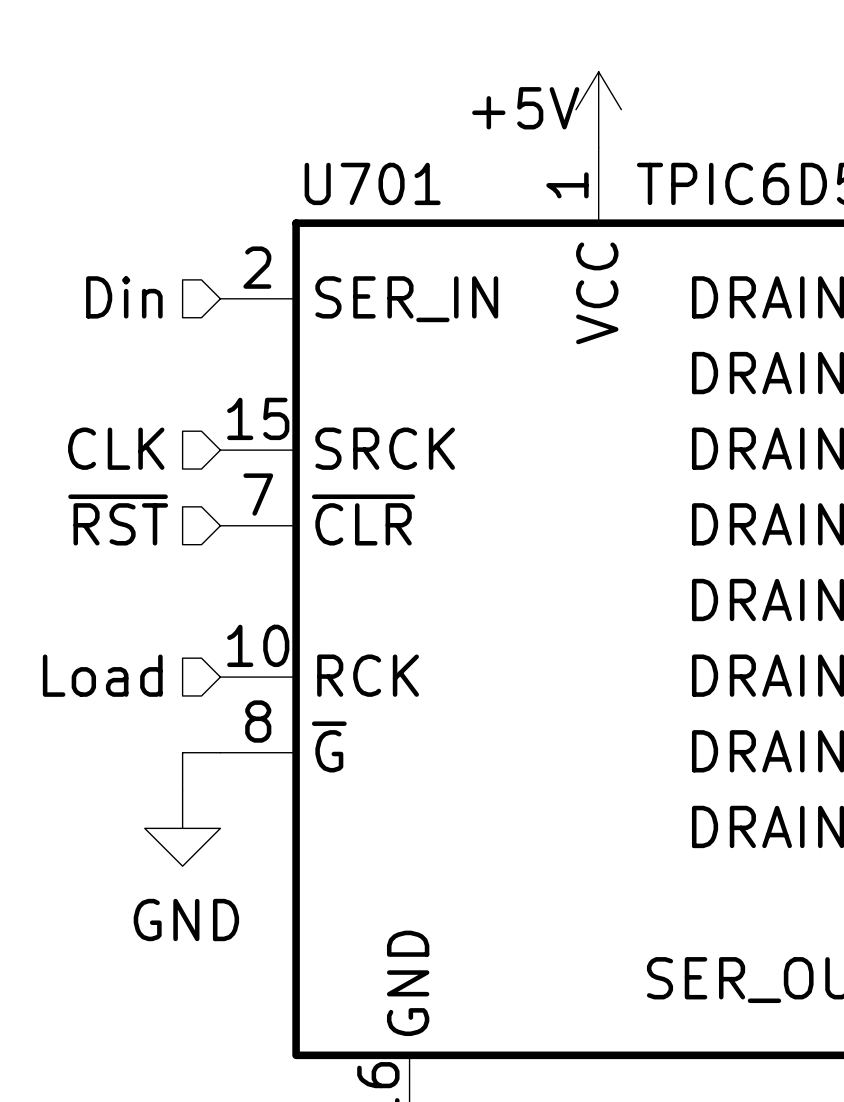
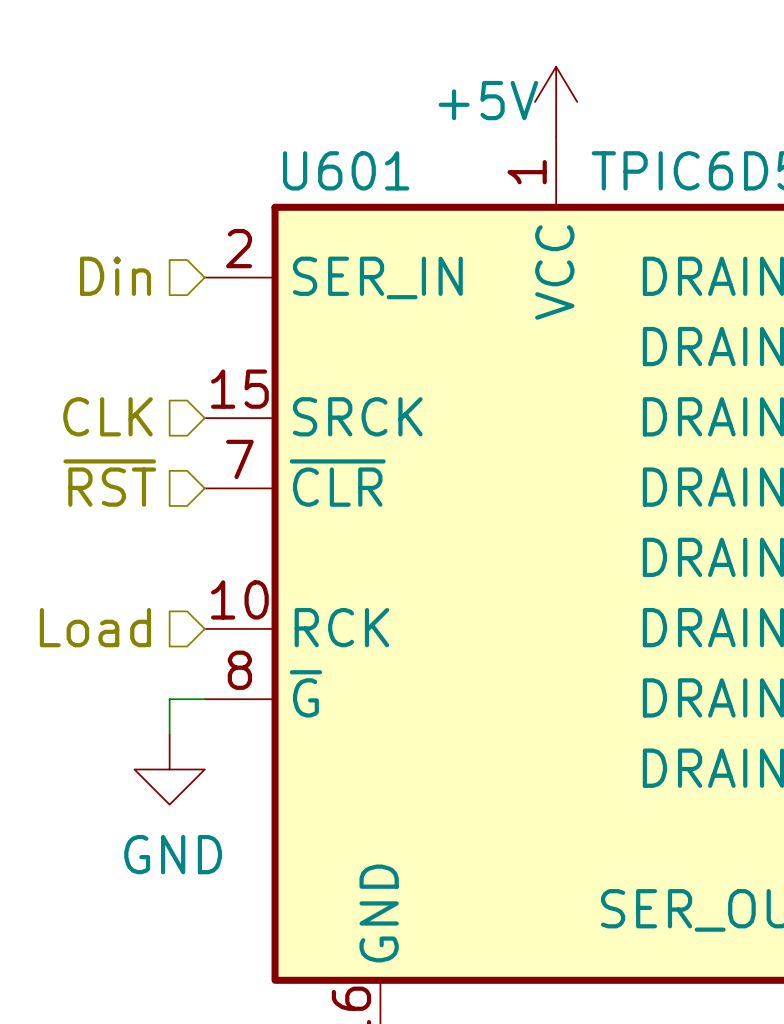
U701 name: U701 (372, 183) -> U601 (346, 170)

